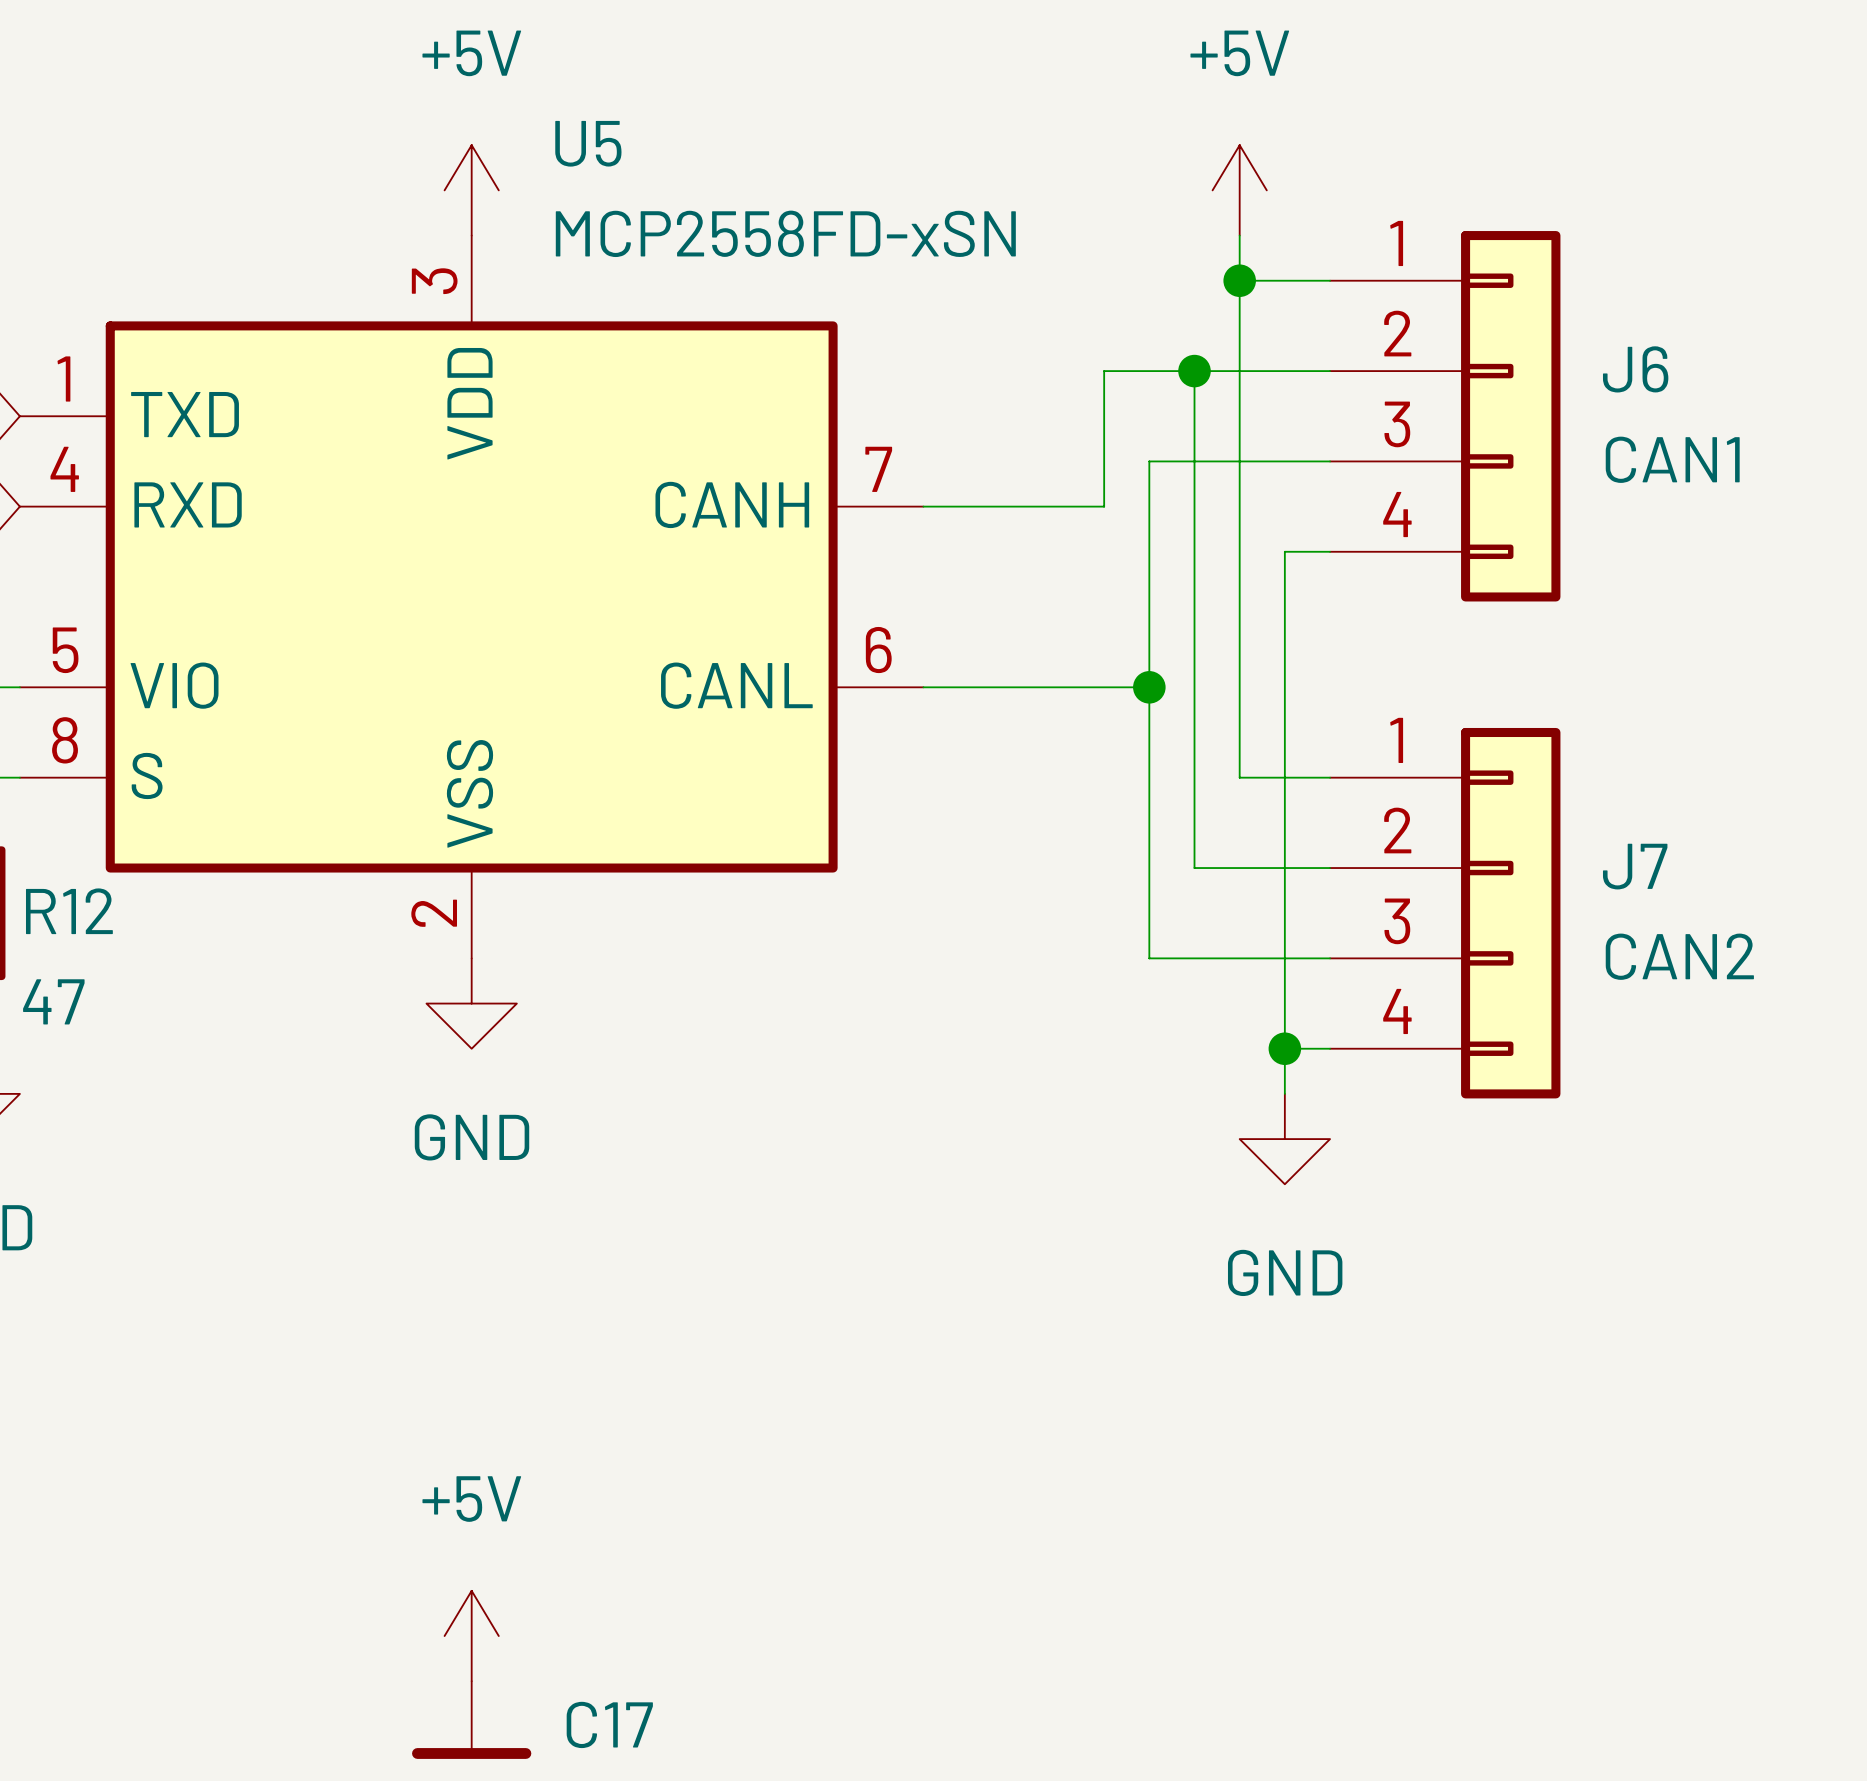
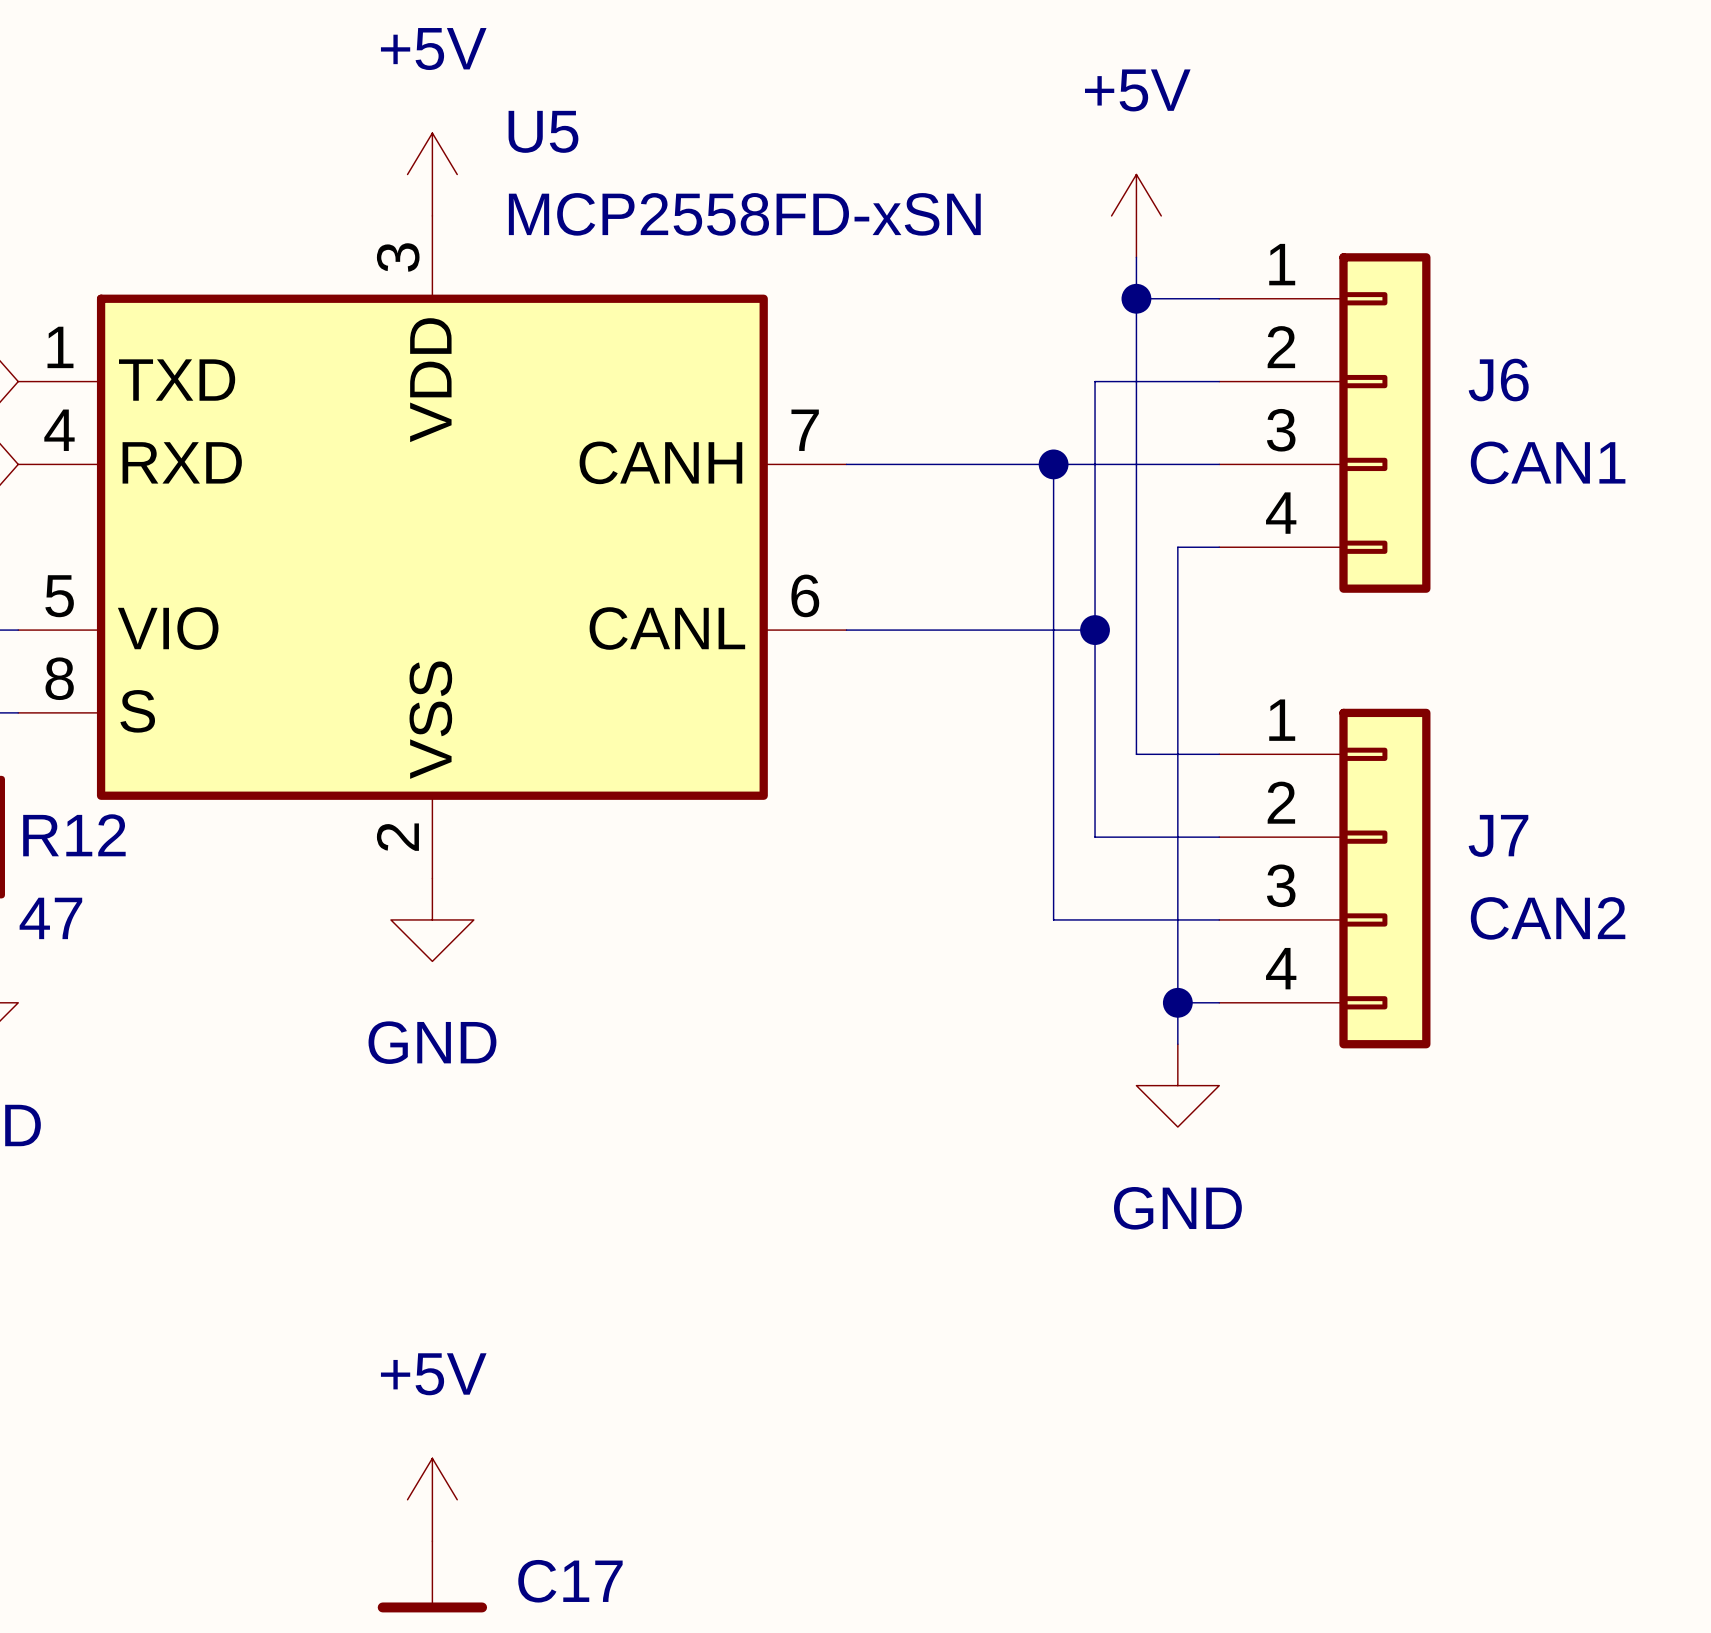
power symbol position: +5V (1239, 190) -> +5V (1136, 215)
wire: (1239, 235) (1239, 280) (1330, 280) -> none
junction: (1239, 280) -> none
wire: none -> (1136, 298) (1219, 298)
junction: none -> (1136, 298)
wire: (1194, 371) (1194, 416) -> (1219, 381) (1095, 381)
junction: (1194, 371) -> none
wire: (1330, 371) (1104, 371) (1104, 506) -> (1219, 464) (1012, 464)
J6 position: (1445, 416) -> (1324, 423)
wire: (1330, 461) (1149, 461) (1149, 506) -> none
junction: none -> (1053, 464)
wire: (1330, 551) (1284, 551) (1284, 596) -> (1219, 547) (1177, 547)
junction position: (1149, 687) -> (1095, 630)
wire: (1239, 777) (1330, 777) -> (1136, 712) (1136, 754) (1219, 754)
wire: (1194, 868) (1330, 868) -> (1095, 795) (1095, 837) (1219, 837)
J7 position: (1445, 913) -> (1324, 878)
wire: (1149, 958) (1330, 958) -> (1053, 878) (1053, 919) (1219, 919)
wire: (1284, 1048) (1330, 1048) -> (1053, 630) (1095, 630)
junction position: (1284, 1048) -> (1177, 1002)
wire: none -> (1219, 1002) (1177, 1002) (1177, 1044)
power symbol position: GND (1284, 1139) -> GND (1177, 1085)

